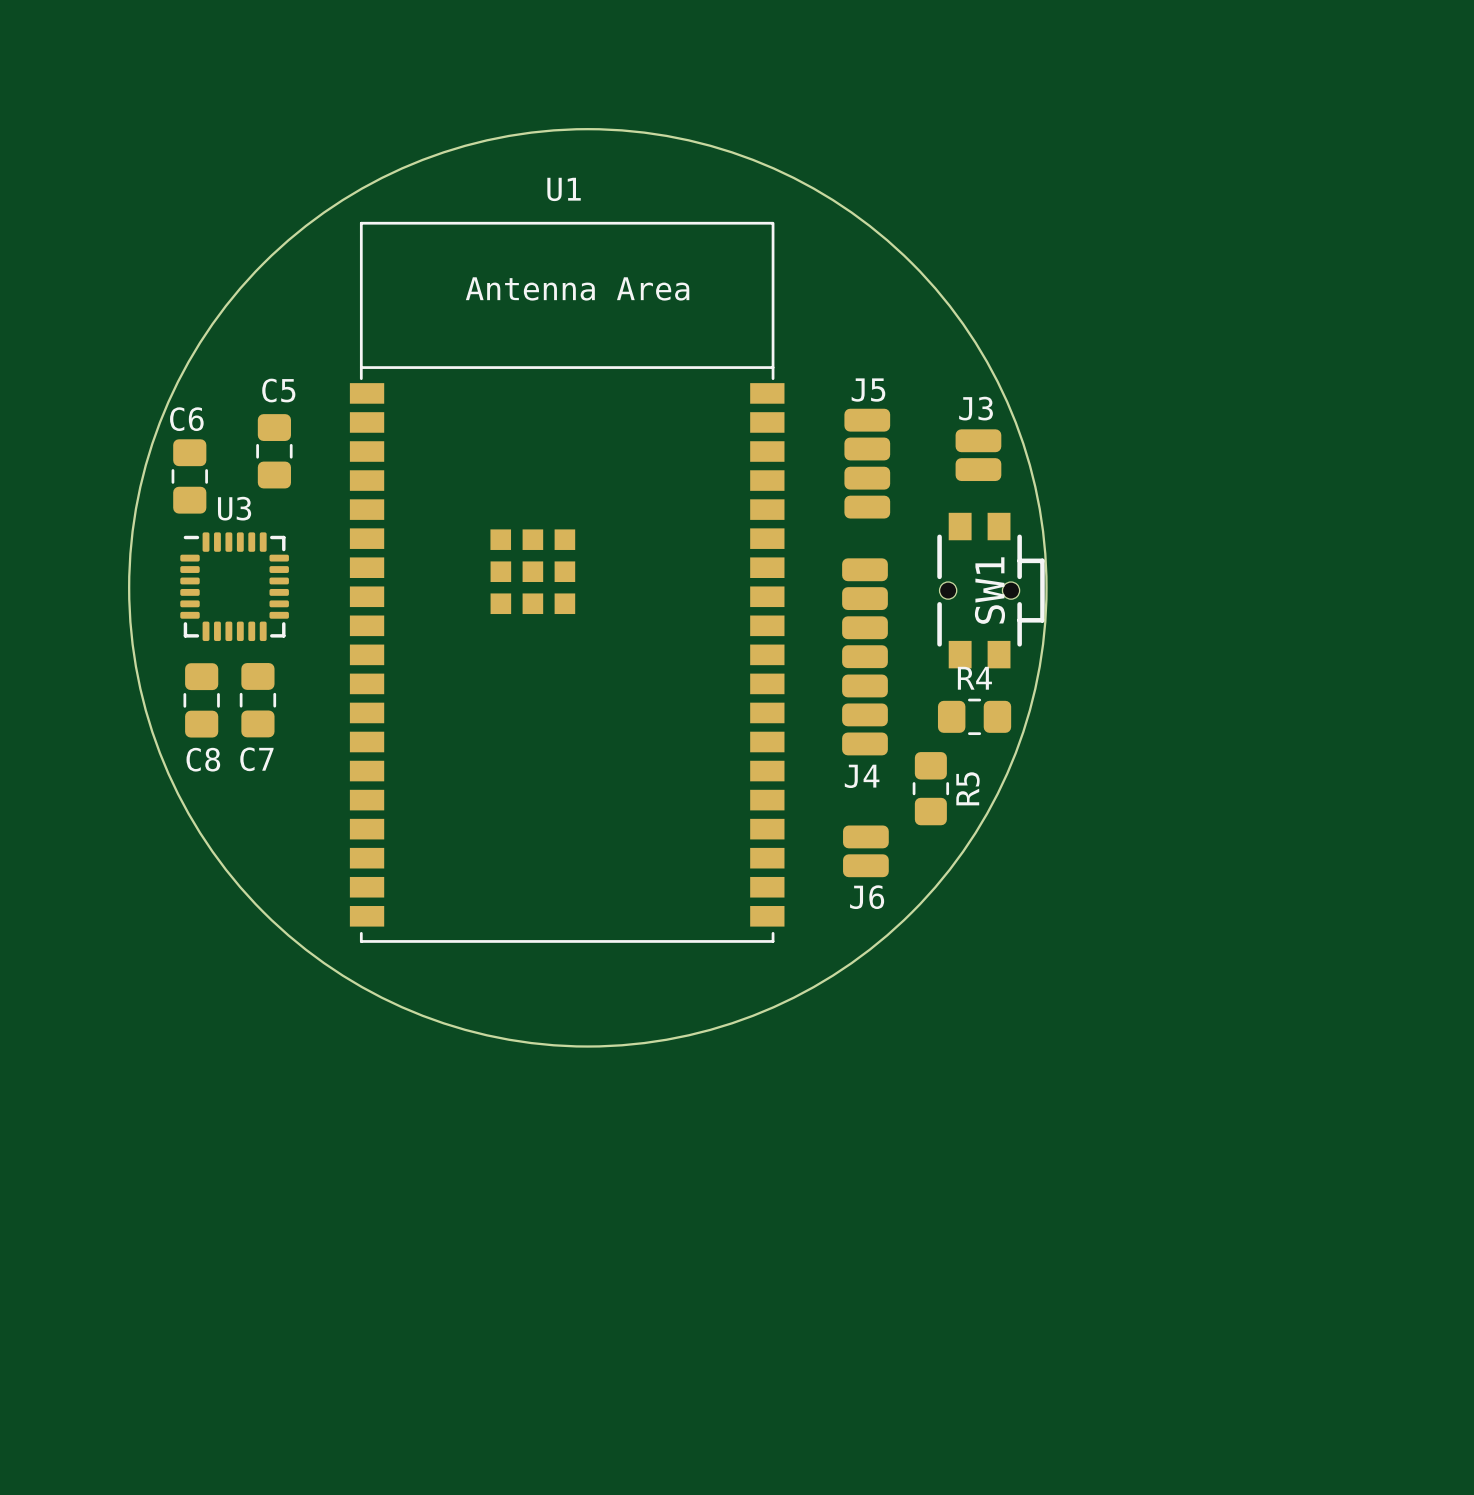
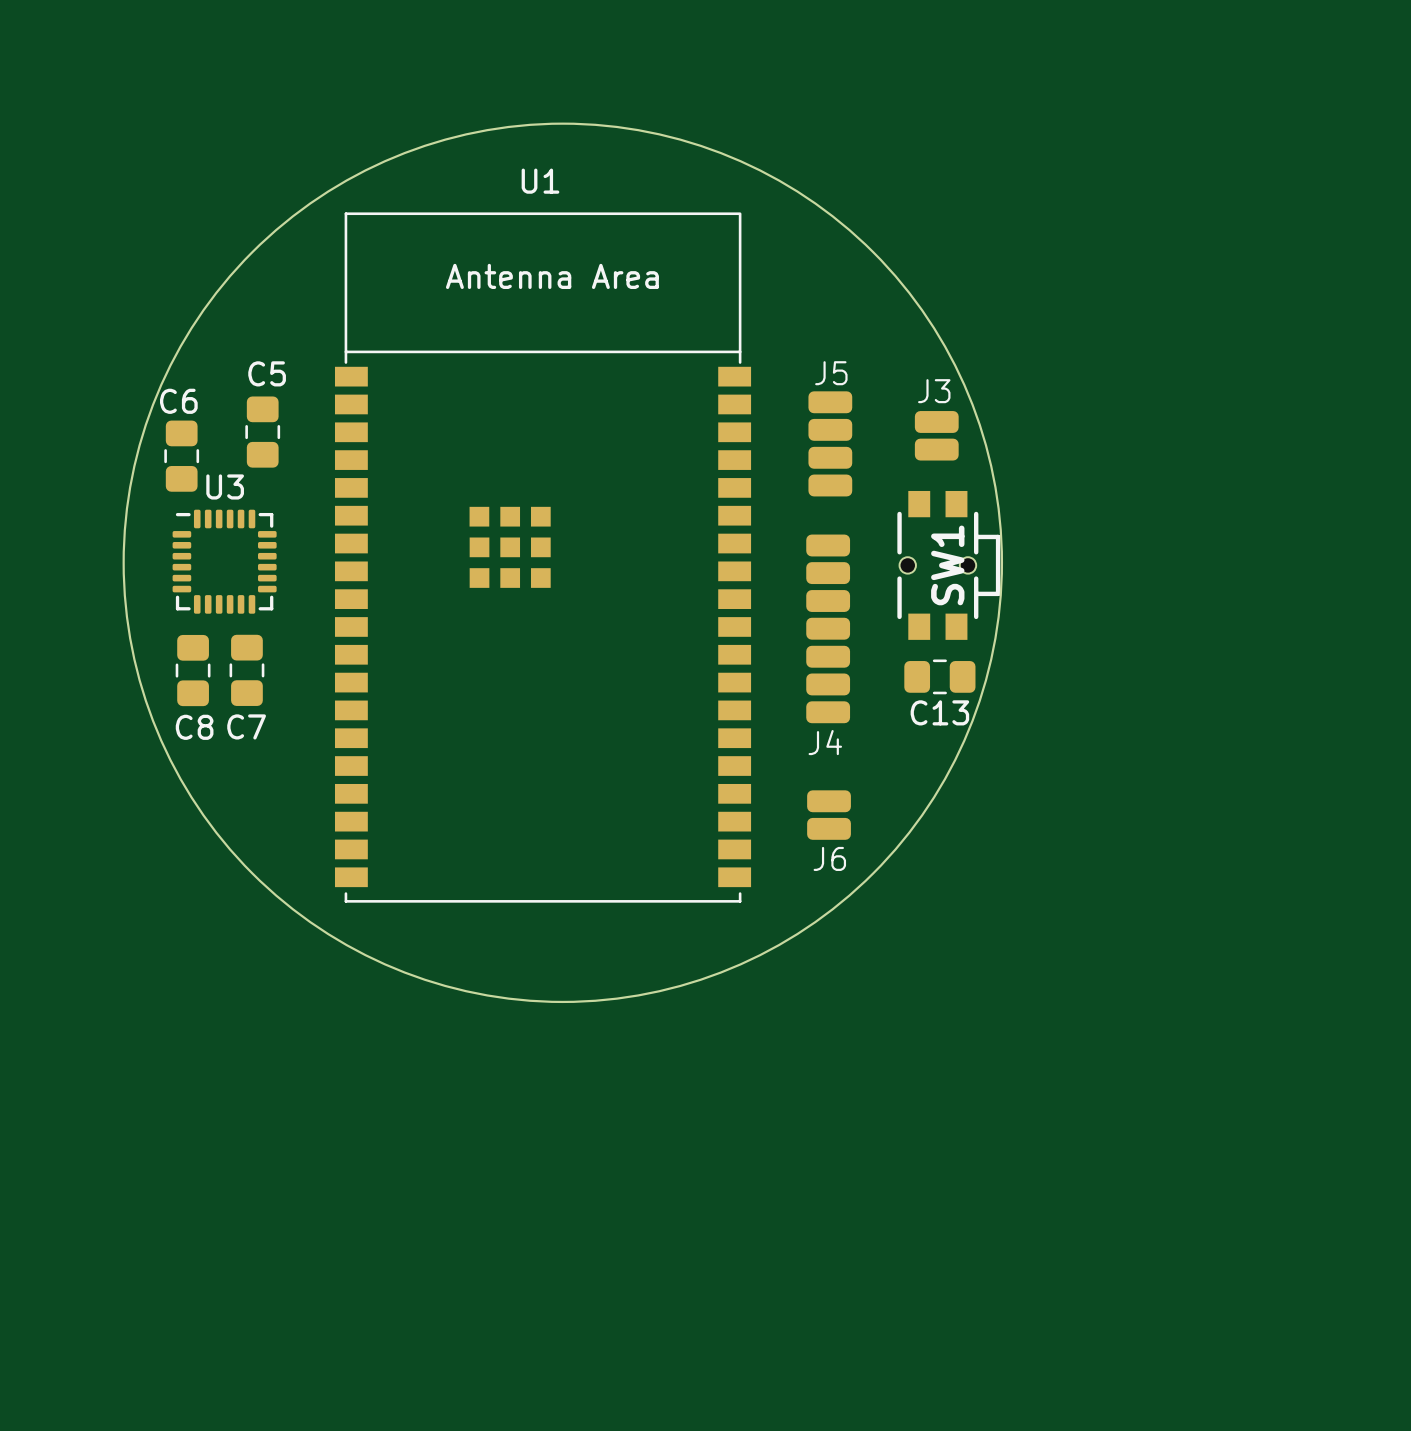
C13: none -> (939, 676)
R4: (974, 716) -> none
R5: (930, 788) -> none

